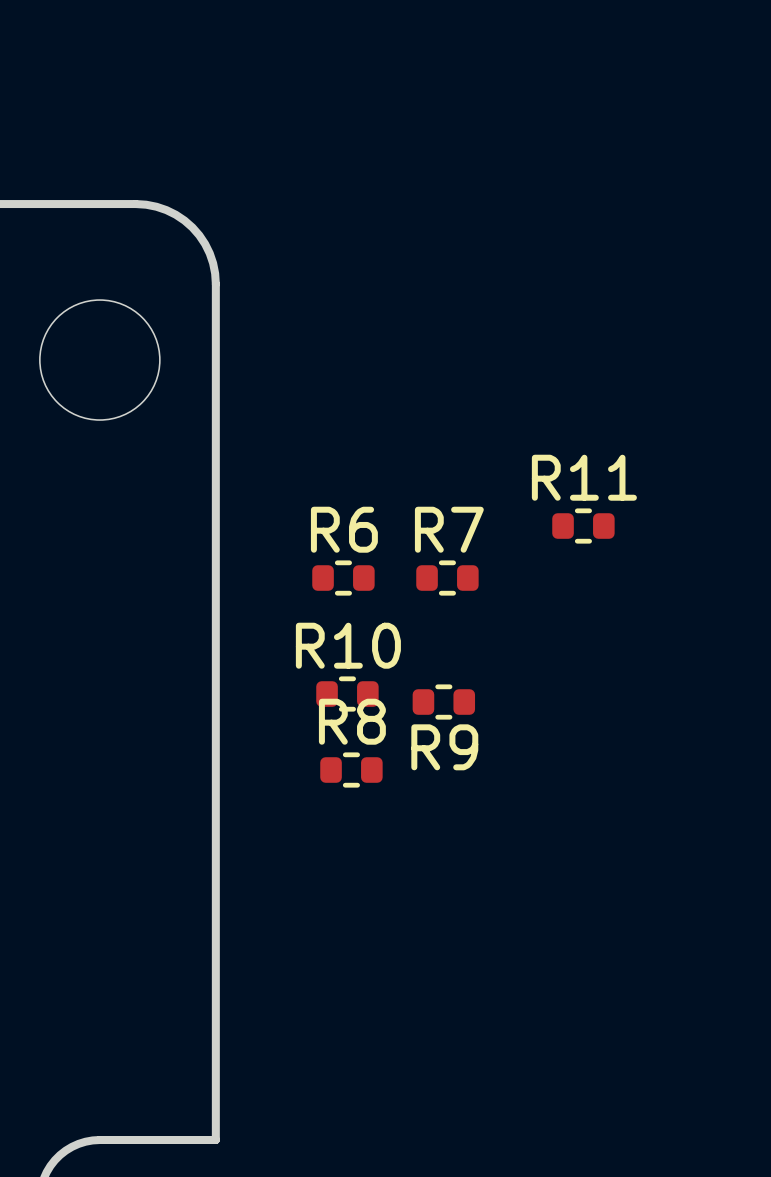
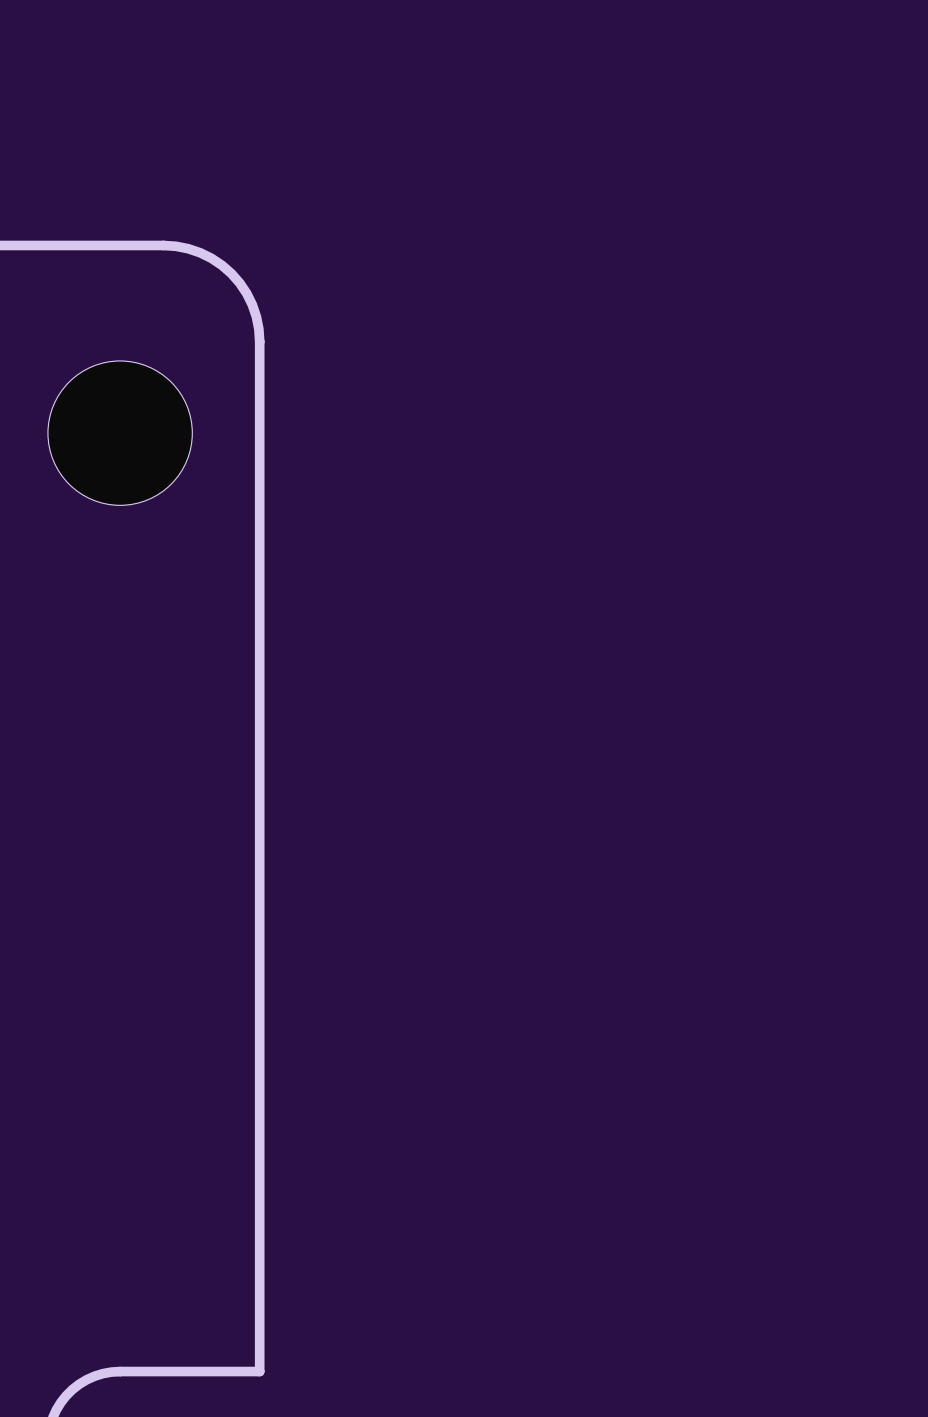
R11: (583, 526) -> none
R6: (343, 578) -> none
R7: (447, 578) -> none
R10: (347, 694) -> none
R9: (443, 702) -> none
R8: (351, 770) -> none

